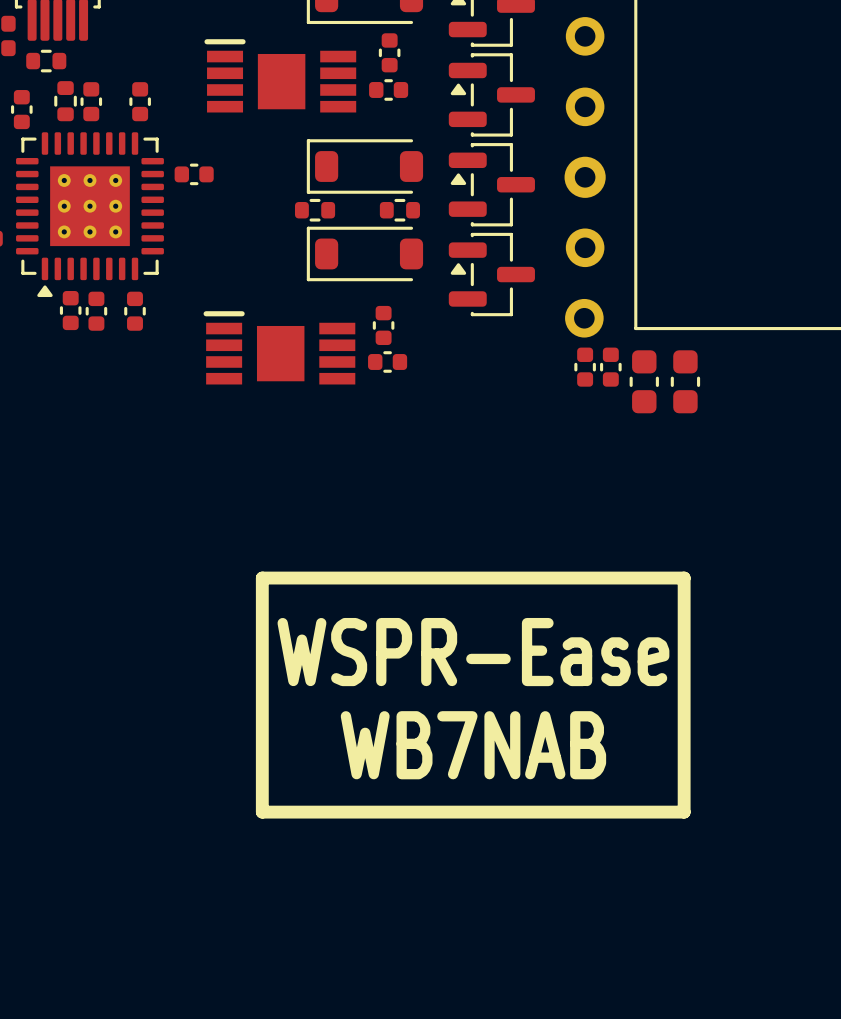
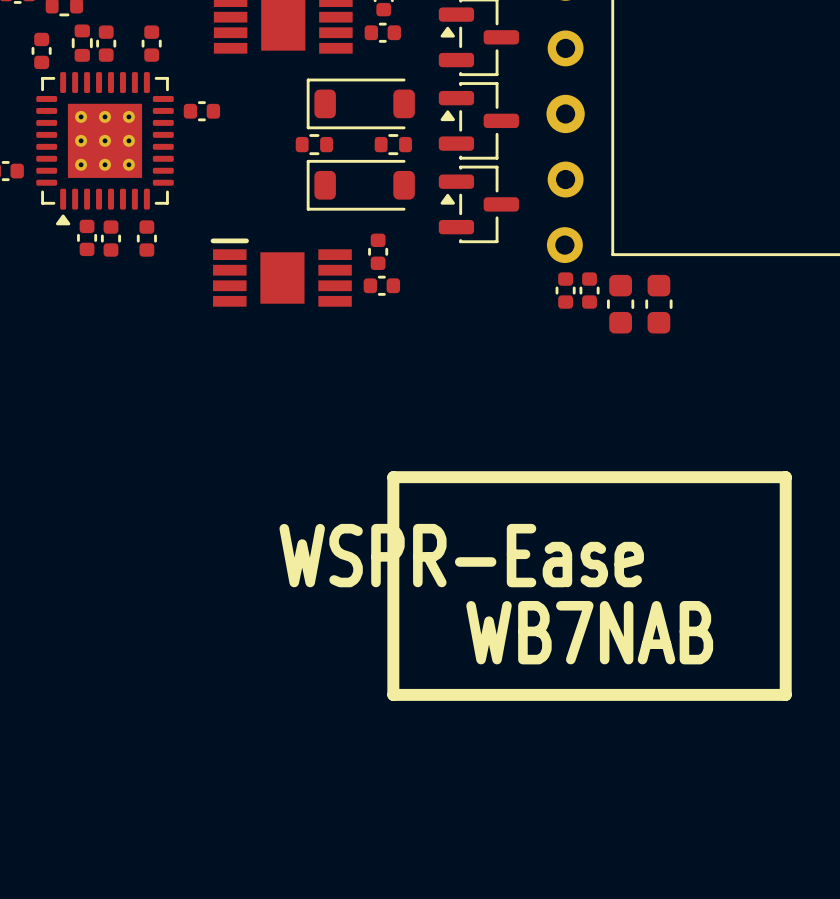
line: (262, 578) (684, 578) (684, 812) (262, 812) (262, 578) -> (393, 477) (785, 477) (785, 694) (393, 694) (393, 477)
text position: WB7NAB (473, 745) -> WB7NAB (589, 632)

